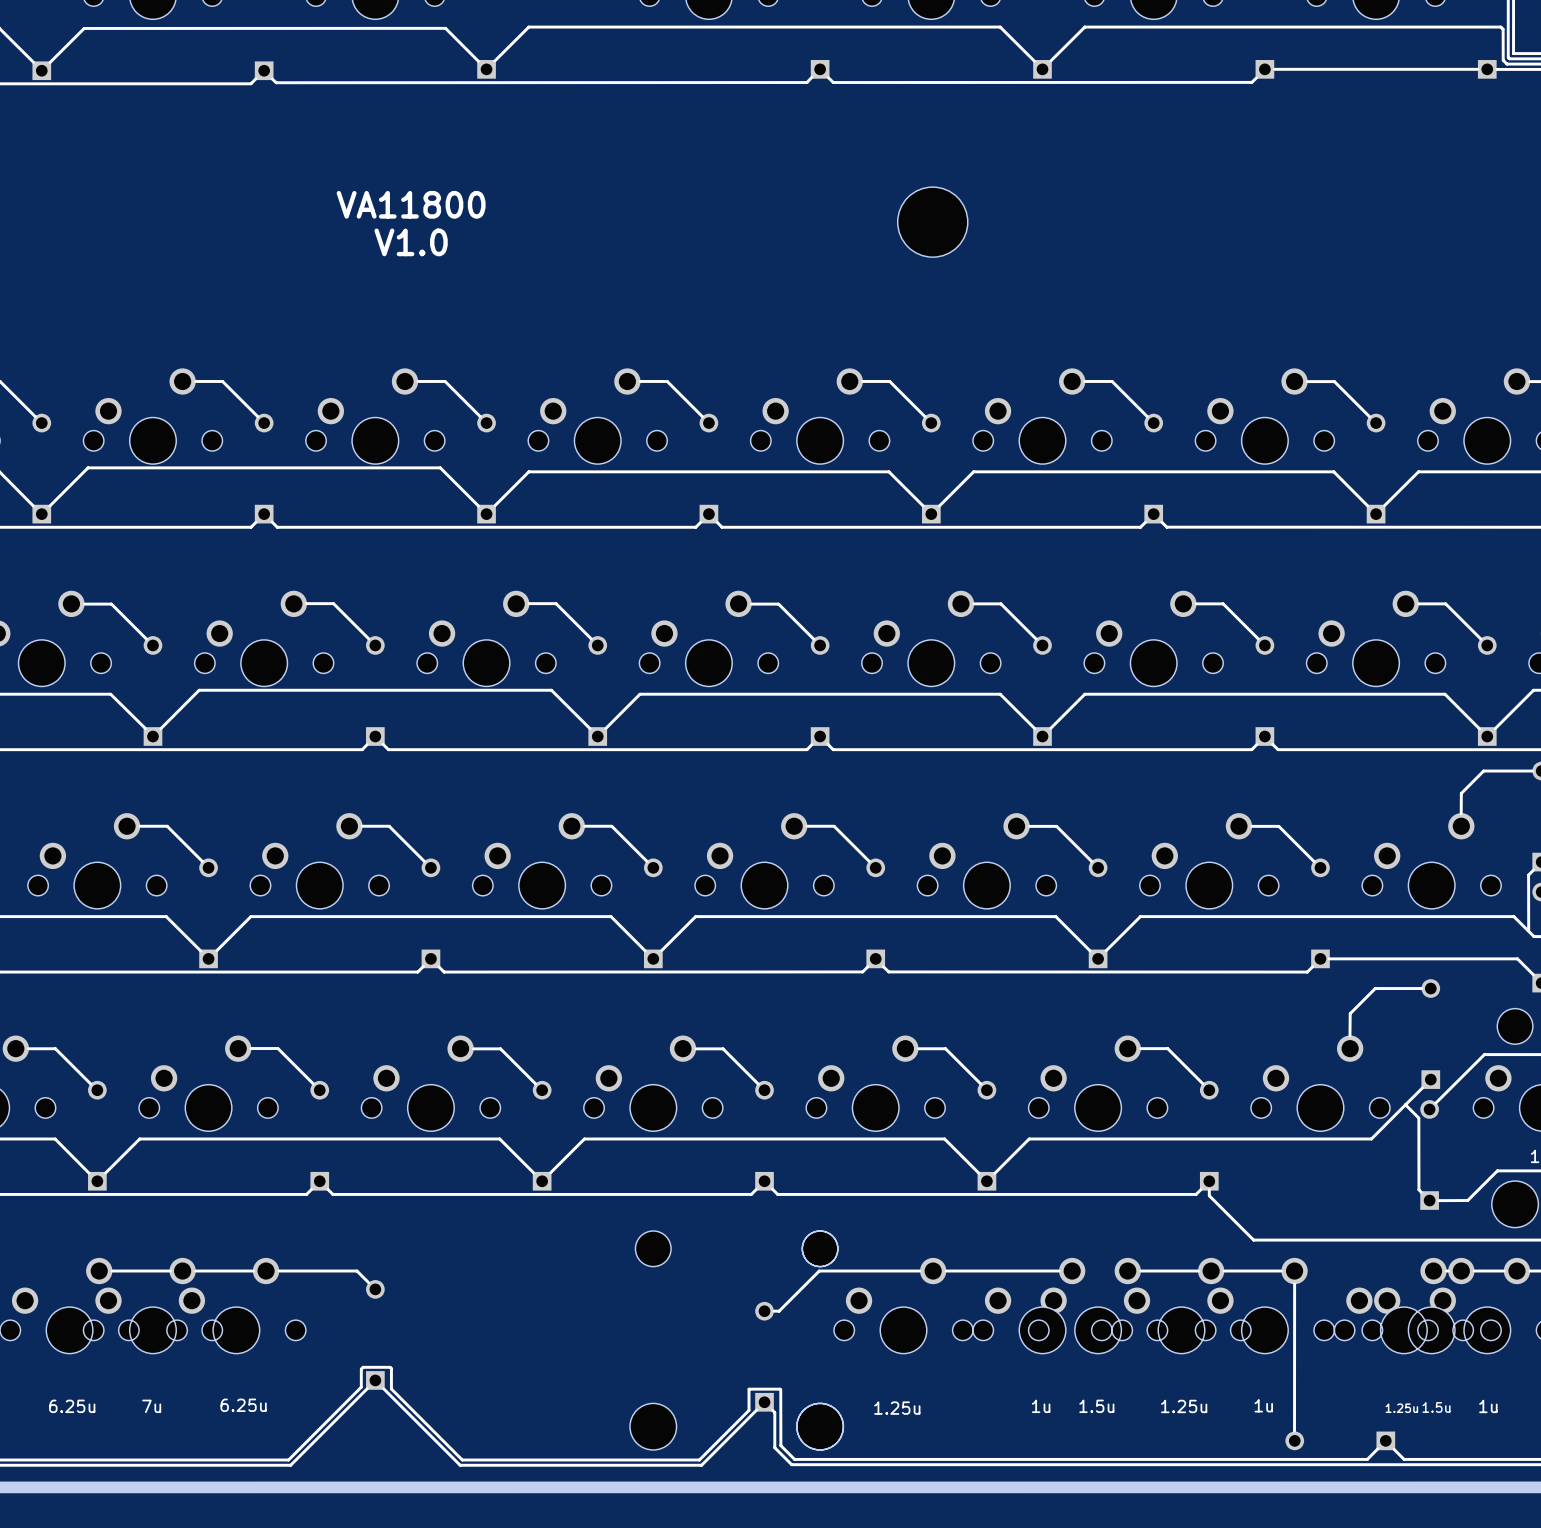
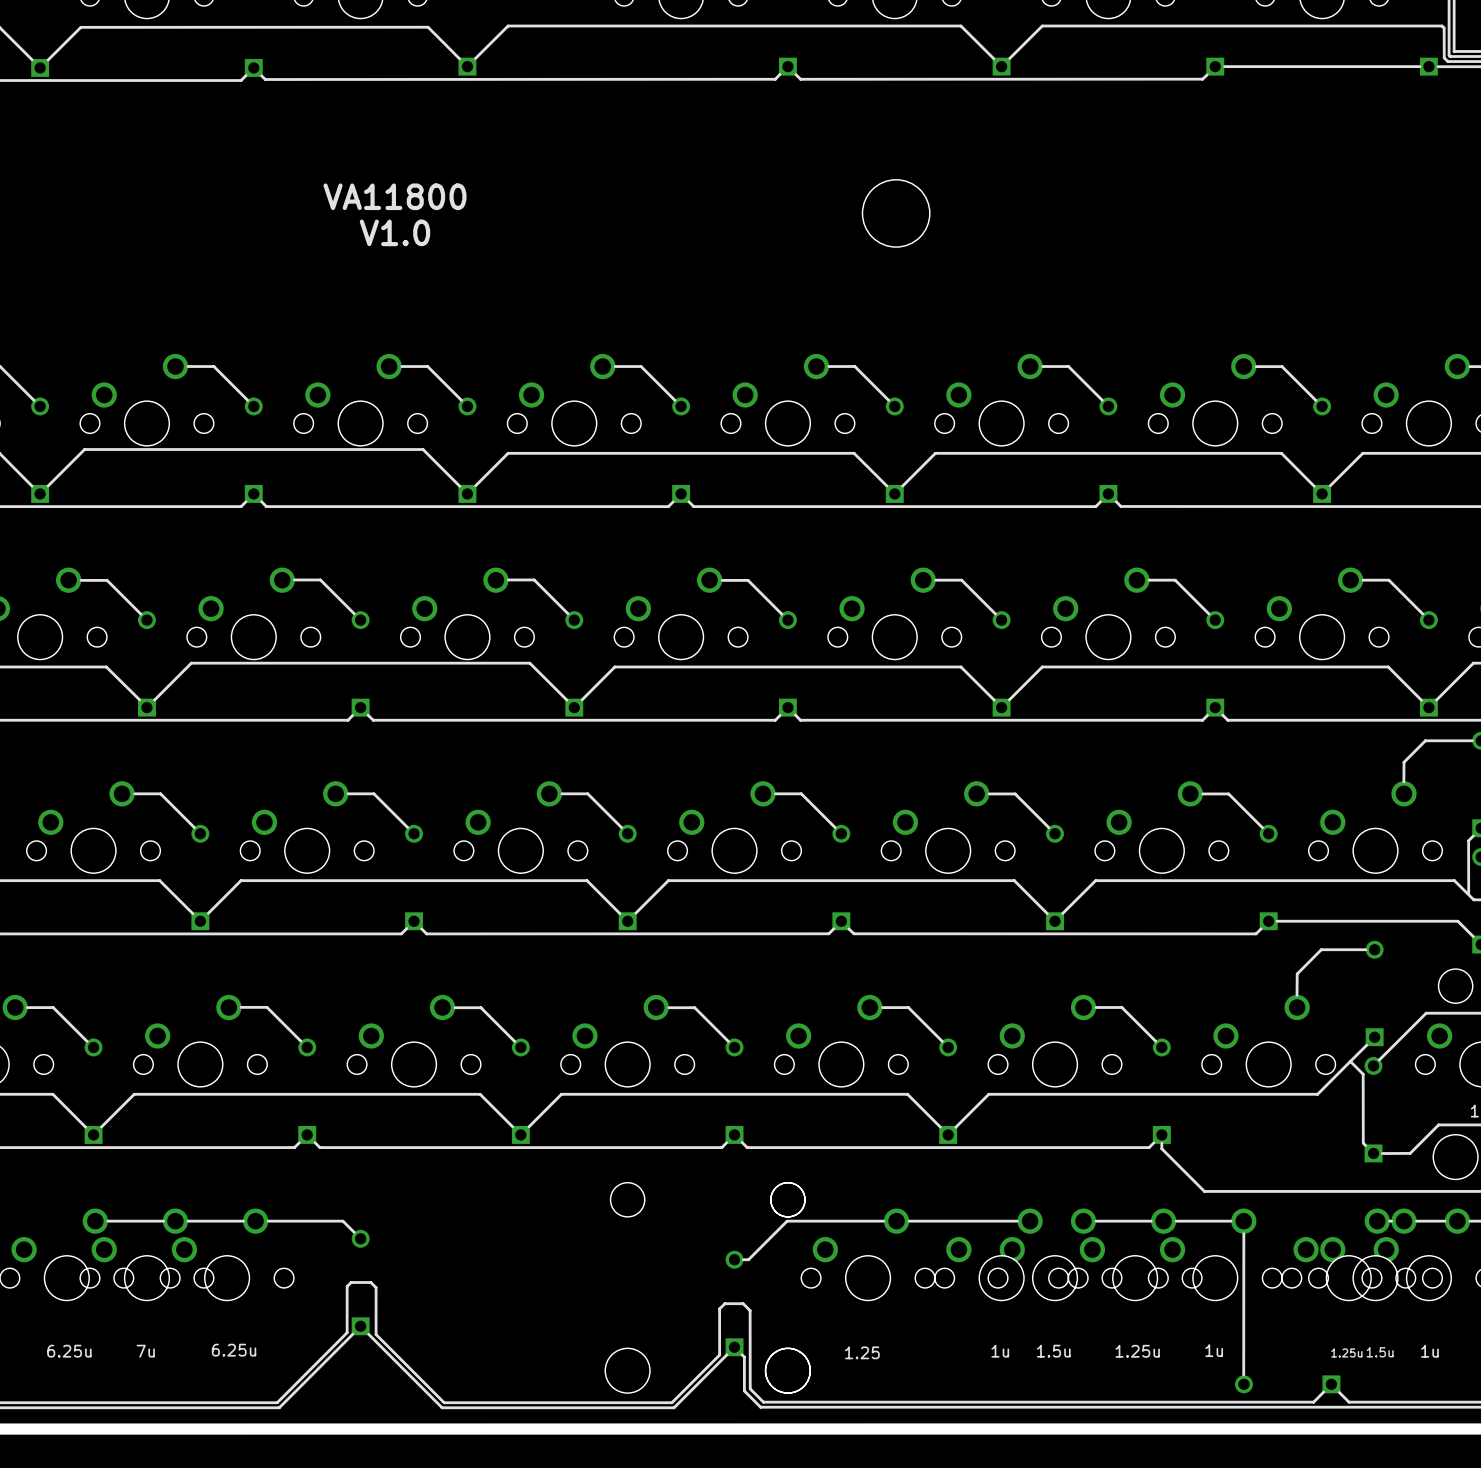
line: (391, 1368) (363, 1367) (361, 1369) -> (376, 1314) (376, 1287) (370, 1282) (351, 1282) (347, 1286) (347, 1315)
line: (749, 1389) (780, 1389) -> none
line: (780, 1389) (780, 1445) -> (719, 1334) (719, 1308) (724, 1303) (743, 1303) (750, 1310) (750, 1388)
text: 1.25u (897, 1408) -> 1.25 (862, 1352)

